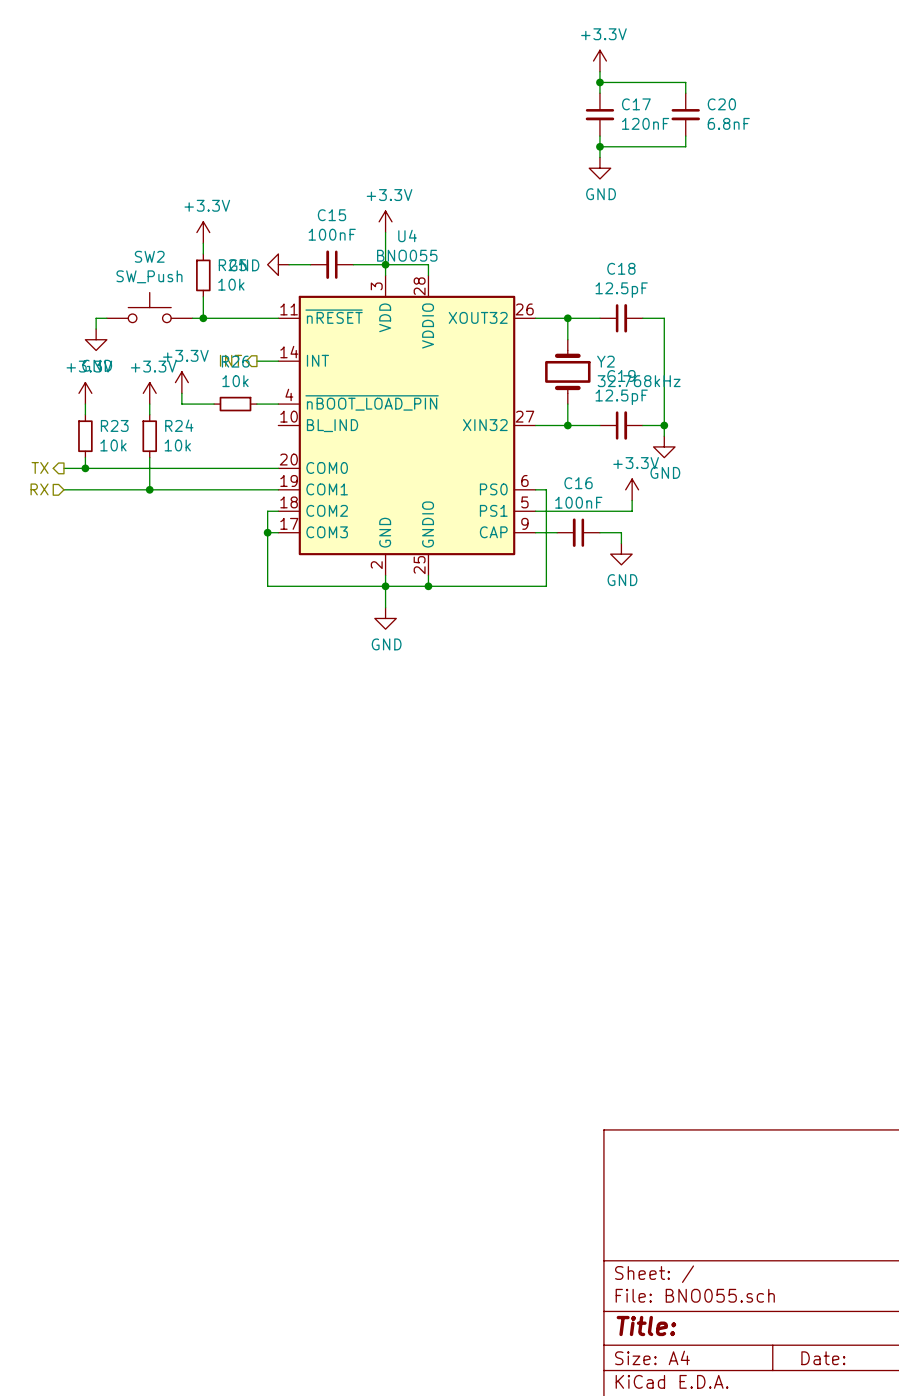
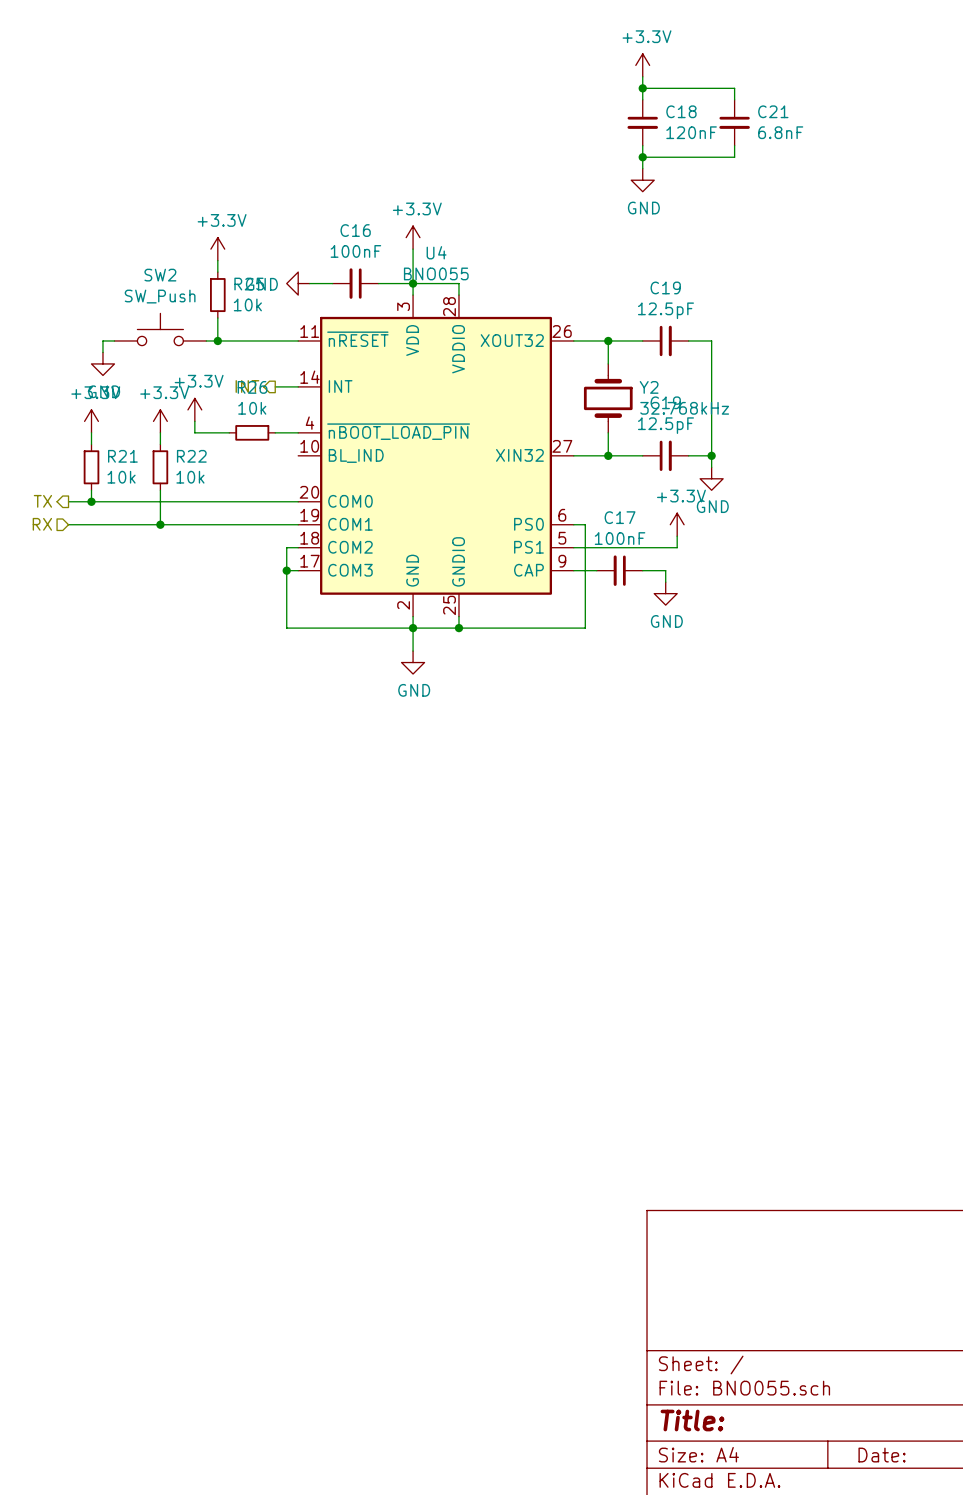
C17 name: C17 (636, 104) -> C18 (681, 111)
C20 name: C20 (721, 104) -> C21 (773, 111)
C15 name: C15 (331, 215) -> C16 (355, 230)
C18 name: C18 (621, 268) -> C19 (665, 287)
R23 name: R23 (114, 425) -> R21 (122, 456)
R24 name: R24 (179, 425) -> R22 (191, 456)
C16 name: C16 (578, 483) -> C17 (620, 517)

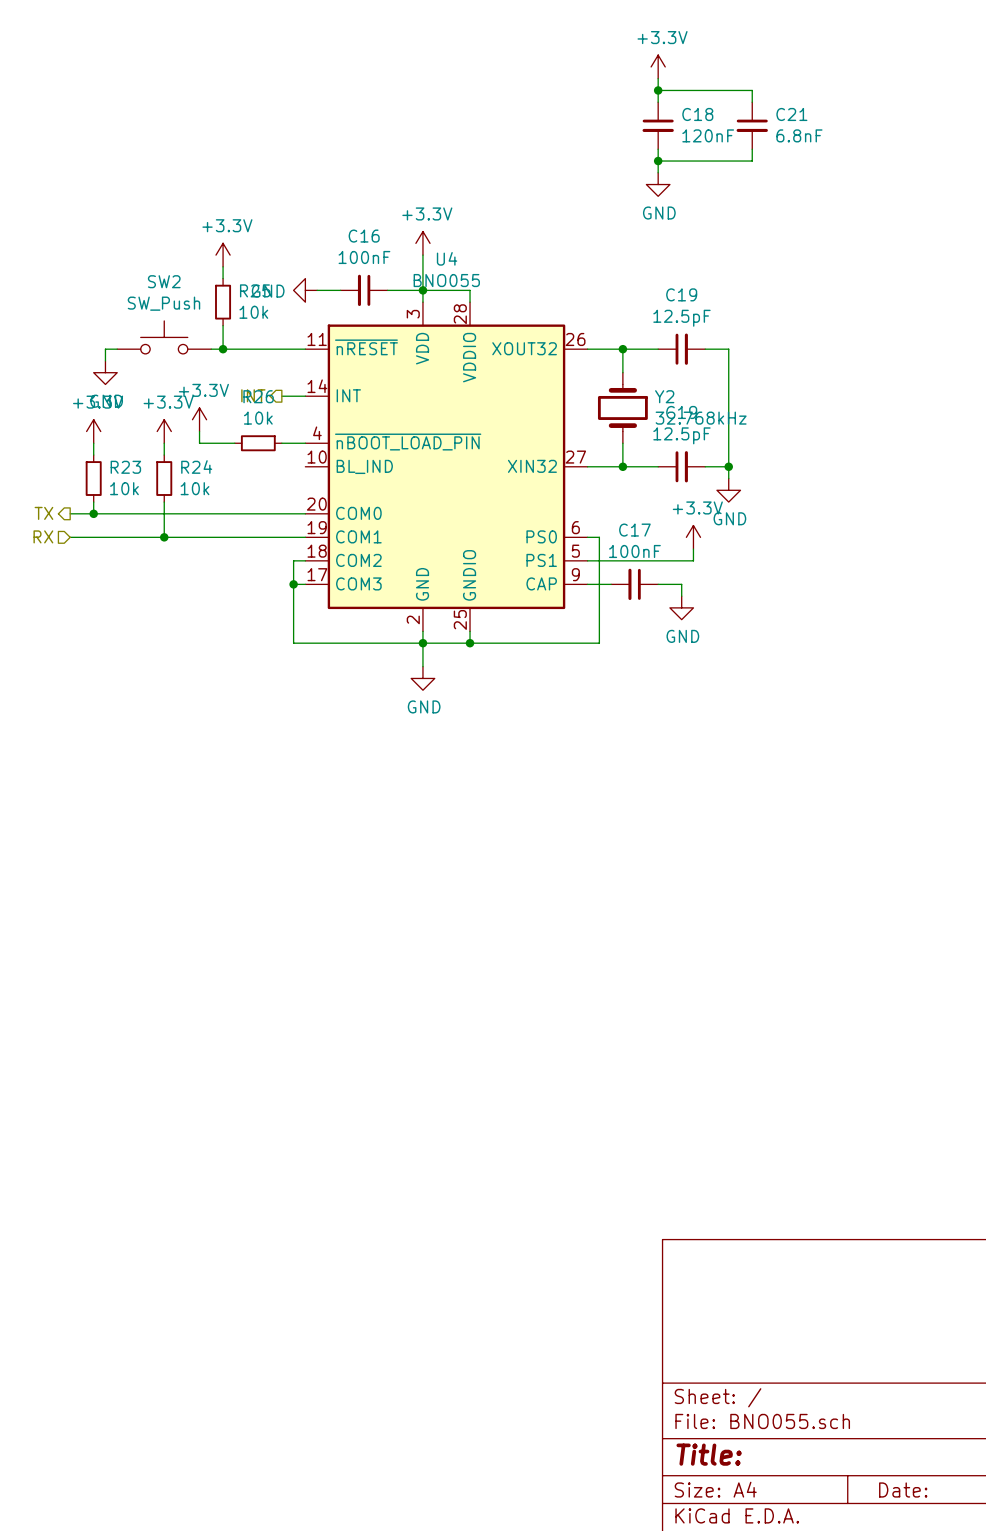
R21 name: R21 (122, 456) -> R23 (125, 467)
R22 name: R22 (191, 456) -> R24 (196, 467)

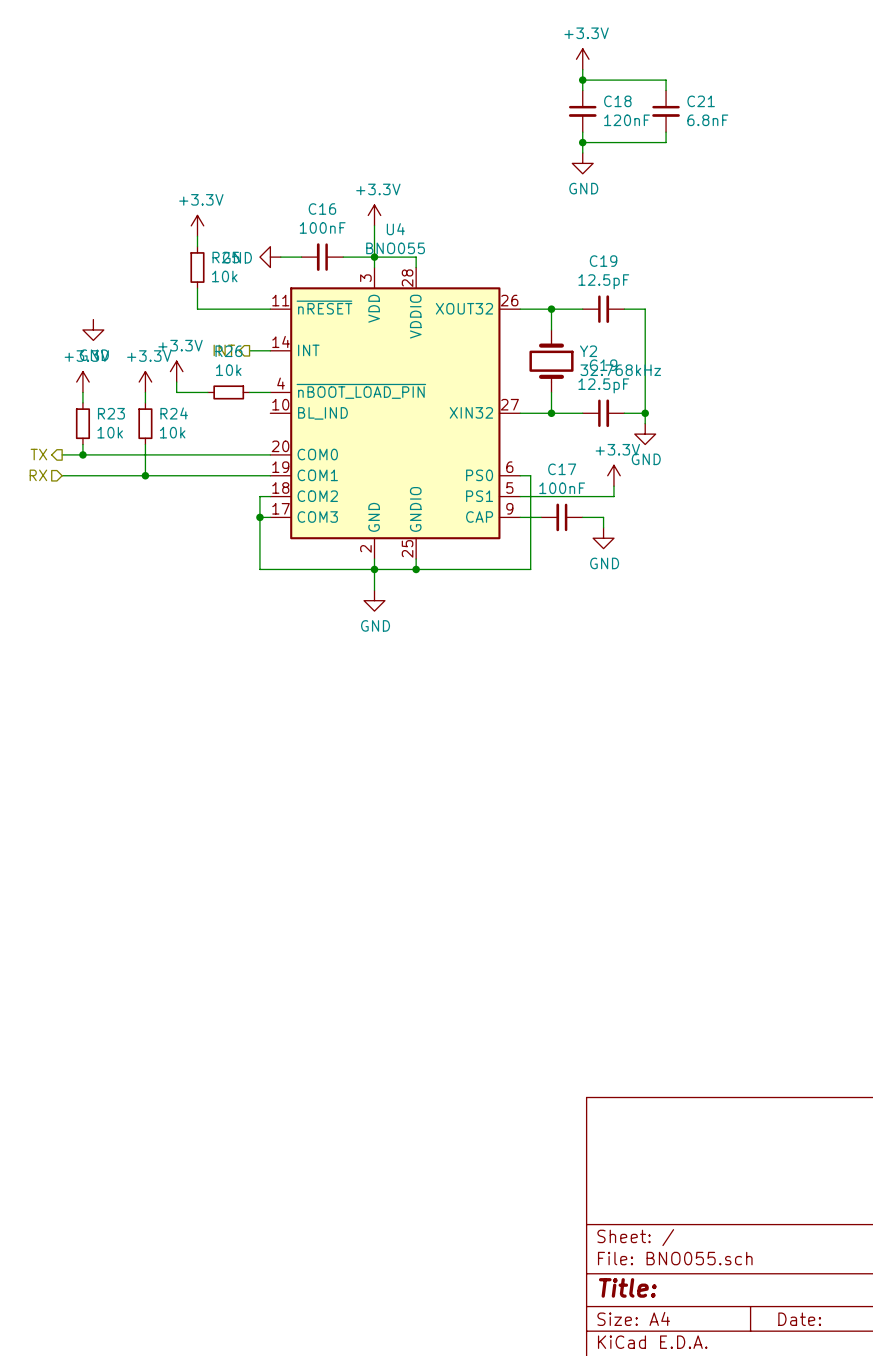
SW2: SW_Push (164, 337) -> none
wire: (117, 349) (105, 349) (105, 360) -> none
wire: (211, 349) (223, 349) -> none
junction: (223, 349) -> none

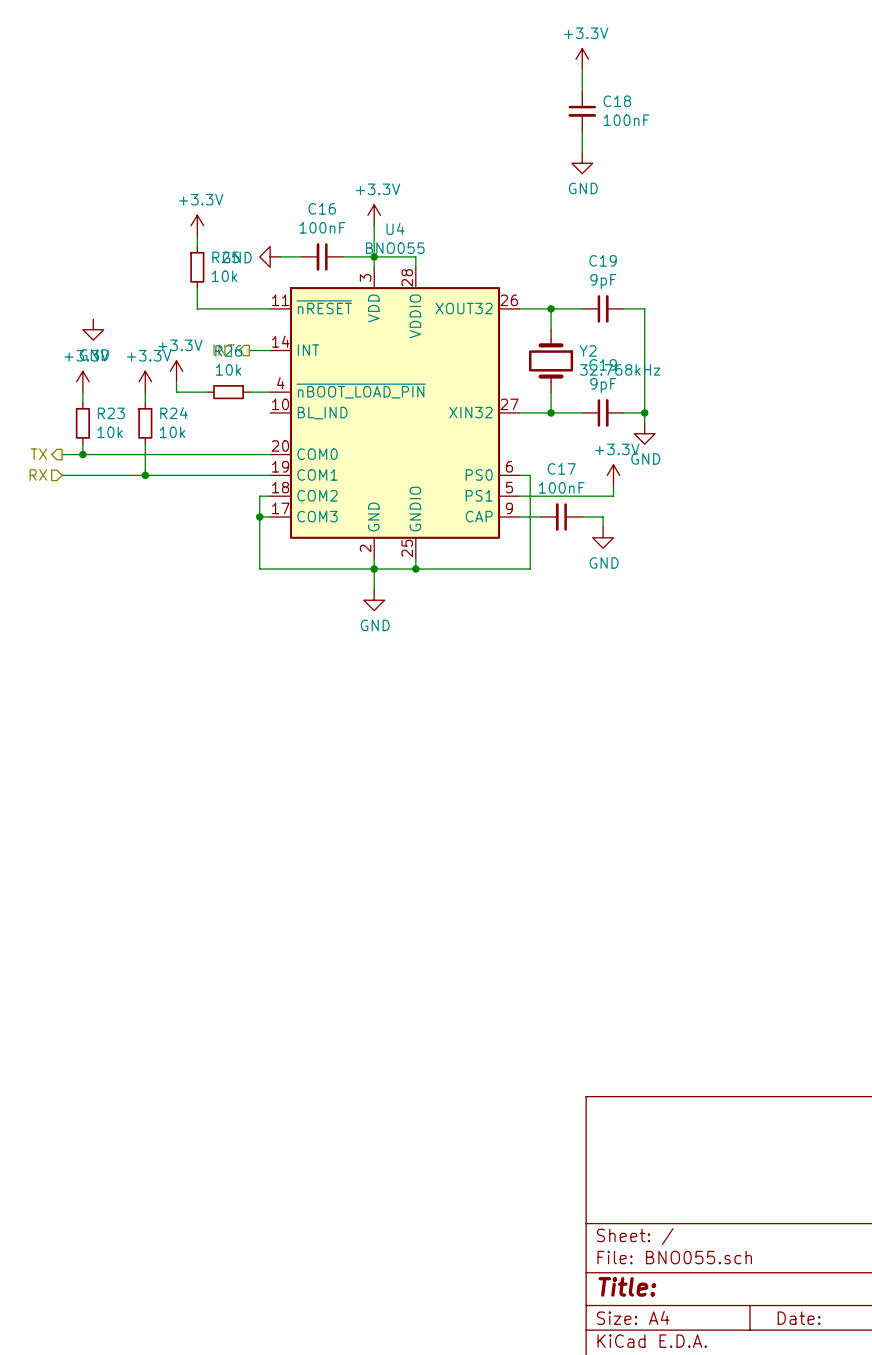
wire: (582, 80) (666, 80) (666, 90) -> none
junction: (582, 80) -> none
C21: 6.8nF (666, 111) -> none
C18 value: 120nF (627, 120) -> 100nF (626, 120)
wire: (666, 132) (666, 142) (582, 142) -> none
junction: (582, 142) -> none
C19 value: 12.5pF (603, 281) -> 9pF (603, 281)
C19 value: 12.5pF (603, 385) -> 9pF (603, 385)

